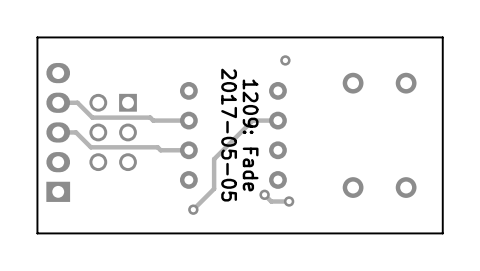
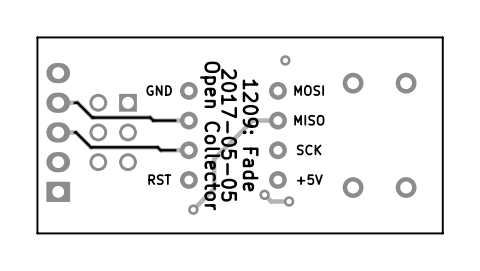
text: none -> GND (159, 90)
text: none -> MOSI (309, 90)
line: none -> (74, 102) (77, 102) (92, 117) (150, 117) (153, 120) (175, 120)
text: none -> MISO (309, 120)
line: none -> (74, 132) (90, 147) (157, 147) (160, 150) (175, 150)
text: none -> Open Collector (210, 136)
text: none -> SCK (309, 149)
text: none -> RST (159, 179)
text: none -> +5V (309, 179)

